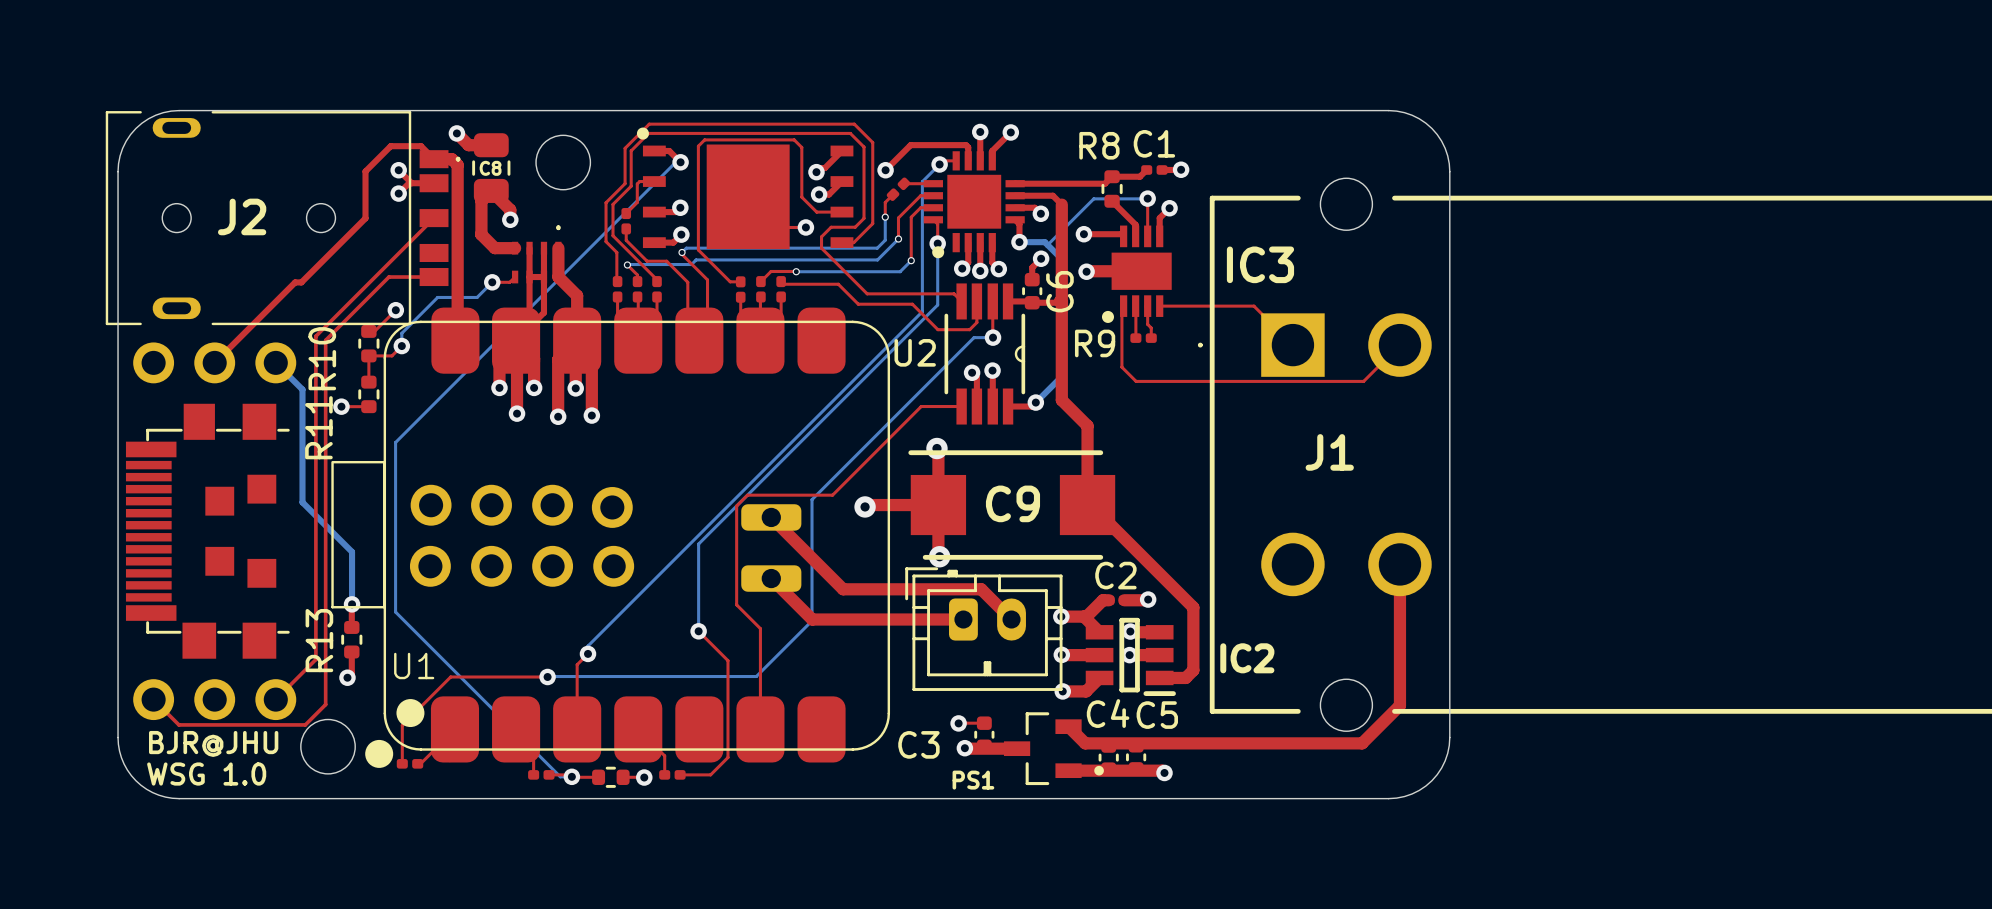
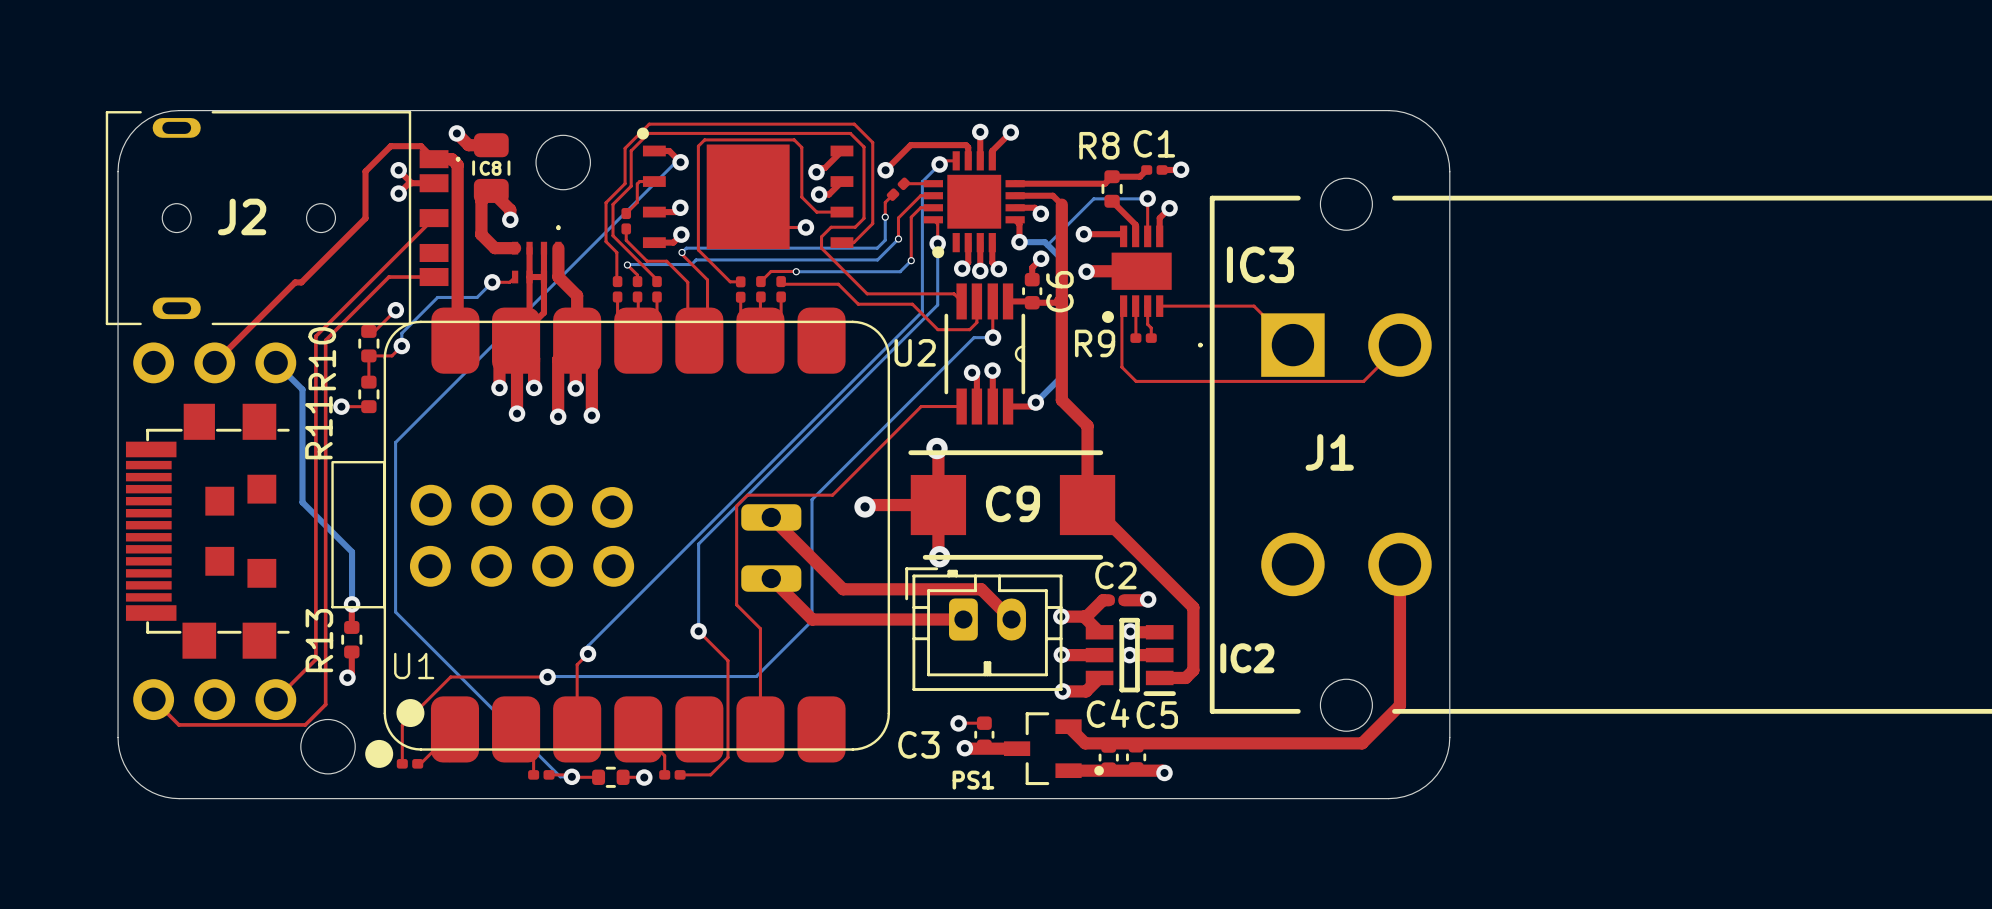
text: BJR@JHU (213, 743) -> none
text: WSG 1.0 (206, 774) -> none

